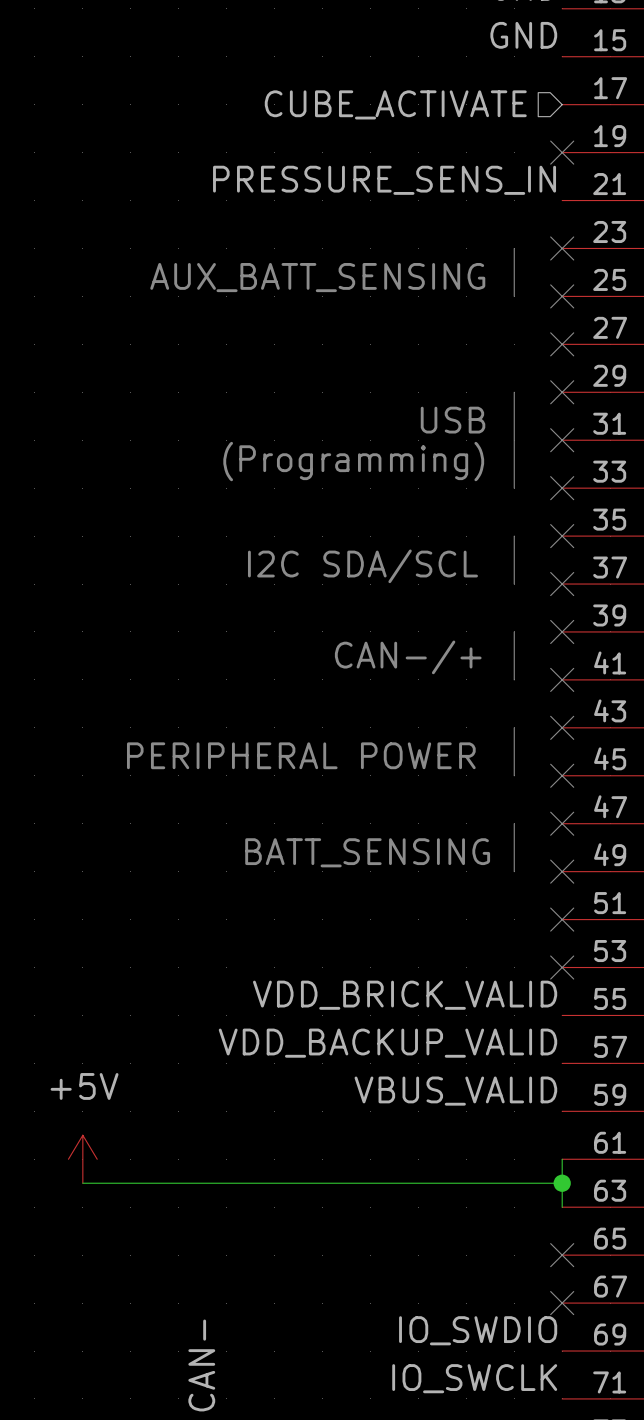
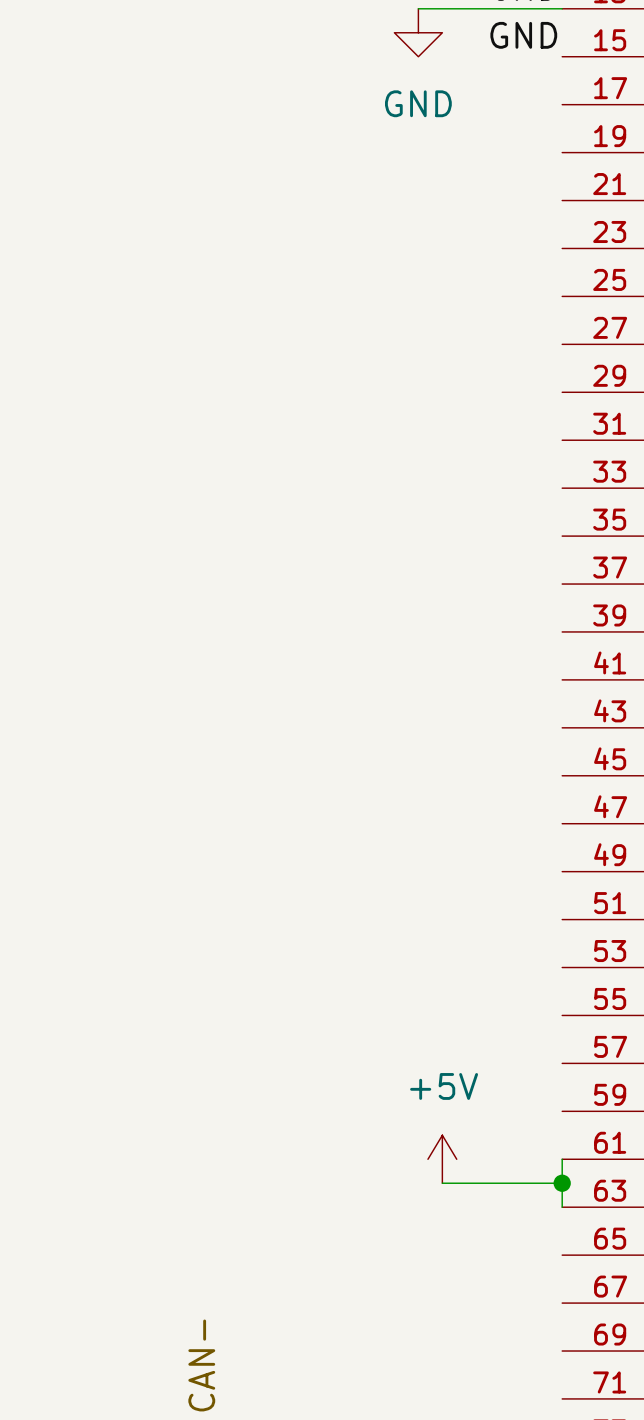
wire: none -> (418, 8) (562, 8)
power symbol: none -> GND (418, 32)
hierarchical label: CUBE_ACTIVATE (395, 104) -> none
no-connect mark: (562, 152) -> none
label: PRESSURE_SENS_IN (384, 180) -> none
bus: (514, 248) (514, 296) -> none
no-connect mark: (562, 248) -> none
text: AUX_BATT_SENSING (317, 277) -> none
no-connect mark: (562, 296) -> none
no-connect mark: (562, 344) -> none
bus: (514, 392) (514, 488) -> none
no-connect mark: (562, 392) -> none
text: USB (453, 420) -> none
no-connect mark: (562, 440) -> none
text: (Programming) (353, 461) -> none
no-connect mark: (562, 488) -> none
bus: (514, 536) (514, 584) -> none
no-connect mark: (562, 536) -> none
text: I2C SDA/SCL (362, 566) -> none
no-connect mark: (562, 584) -> none
bus: (514, 631) (514, 679) -> none
no-connect mark: (562, 631) -> none
text: CAN-/+ (408, 657) -> none
no-connect mark: (562, 679) -> none
bus: (514, 727) (514, 775) -> none
no-connect mark: (562, 727) -> none
text: PERIPHERAL POWER (301, 755) -> none
no-connect mark: (562, 775) -> none
bus: (514, 823) (514, 871) -> none
no-connect mark: (562, 823) -> none
text: BATT_SENSING (367, 852) -> none
no-connect mark: (562, 871) -> none
no-connect mark: (562, 919) -> none
no-connect mark: (562, 967) -> none
label: VDD_BRICK_VALID (405, 995) -> none
label: VDD_BACKUP_VALID (387, 1043) -> none
label: VBUS_VALID (455, 1091) -> none
power symbol position: +5V (82, 1159) -> +5V (442, 1159)
wire: (82, 1183) (442, 1183) -> none
no-connect mark: (562, 1255) -> none
no-connect mark: (562, 1303) -> none
label: IO_SWDIO (478, 1330) -> none
label: IO_SWCLK (474, 1378) -> none

